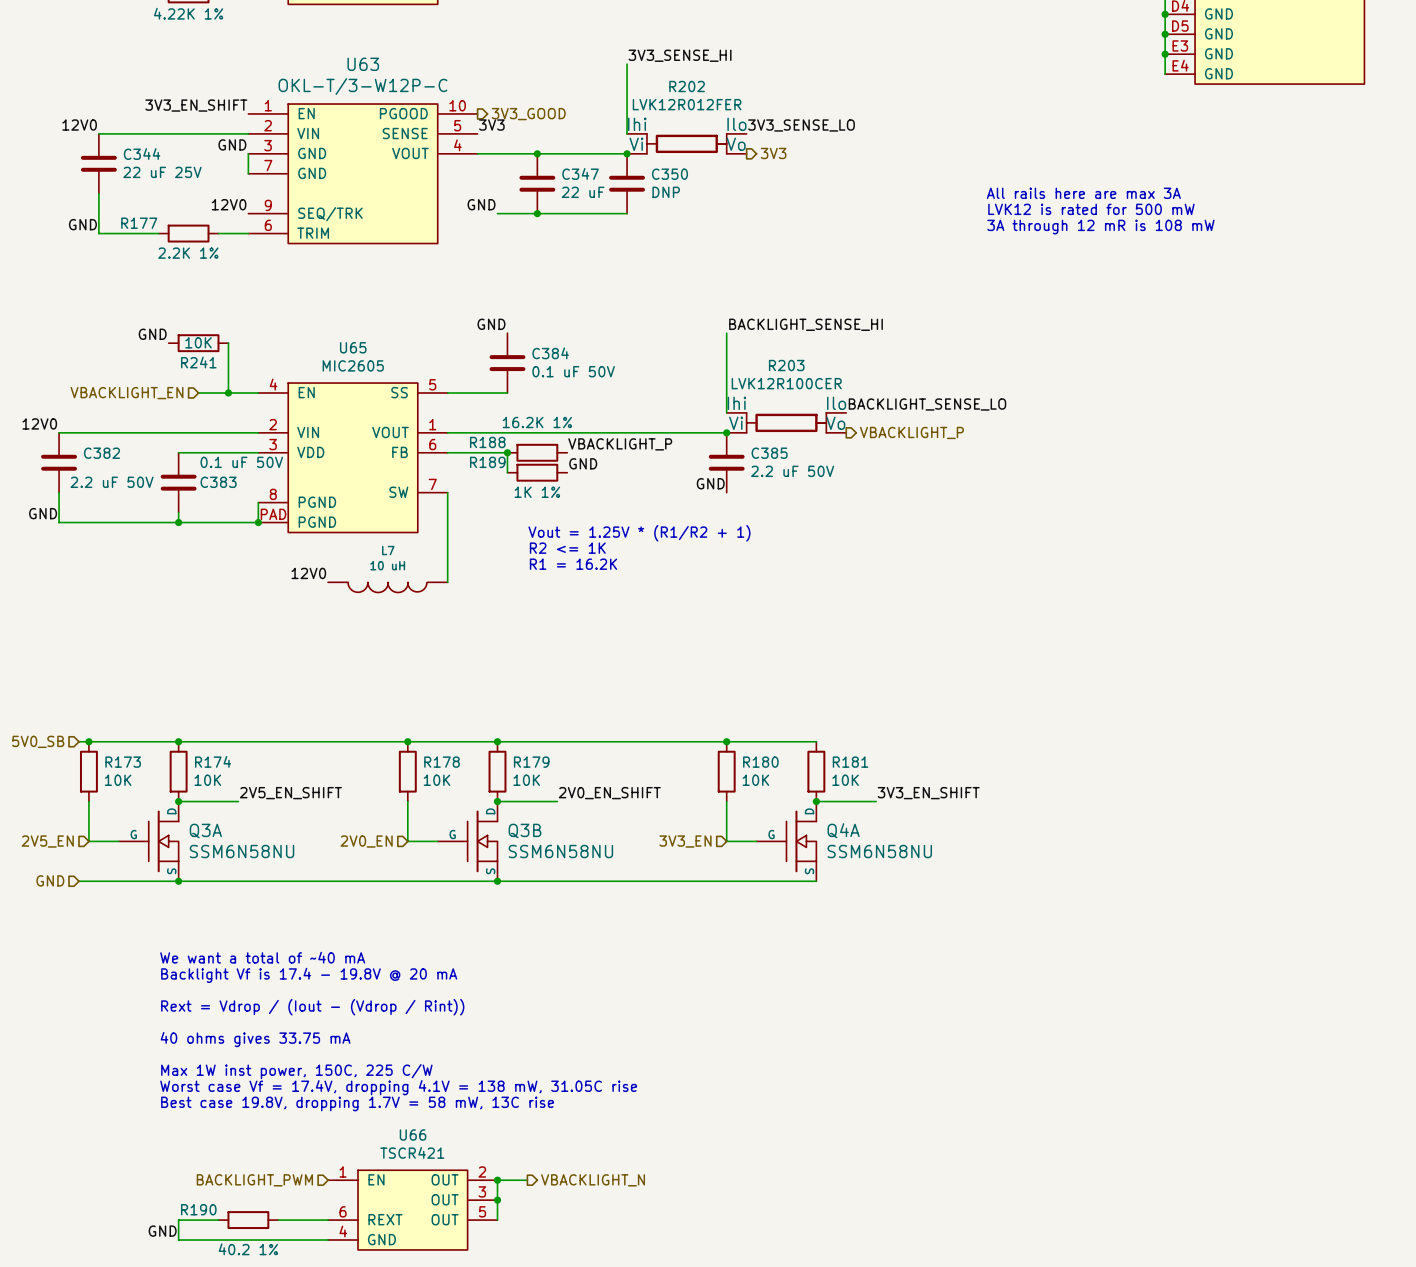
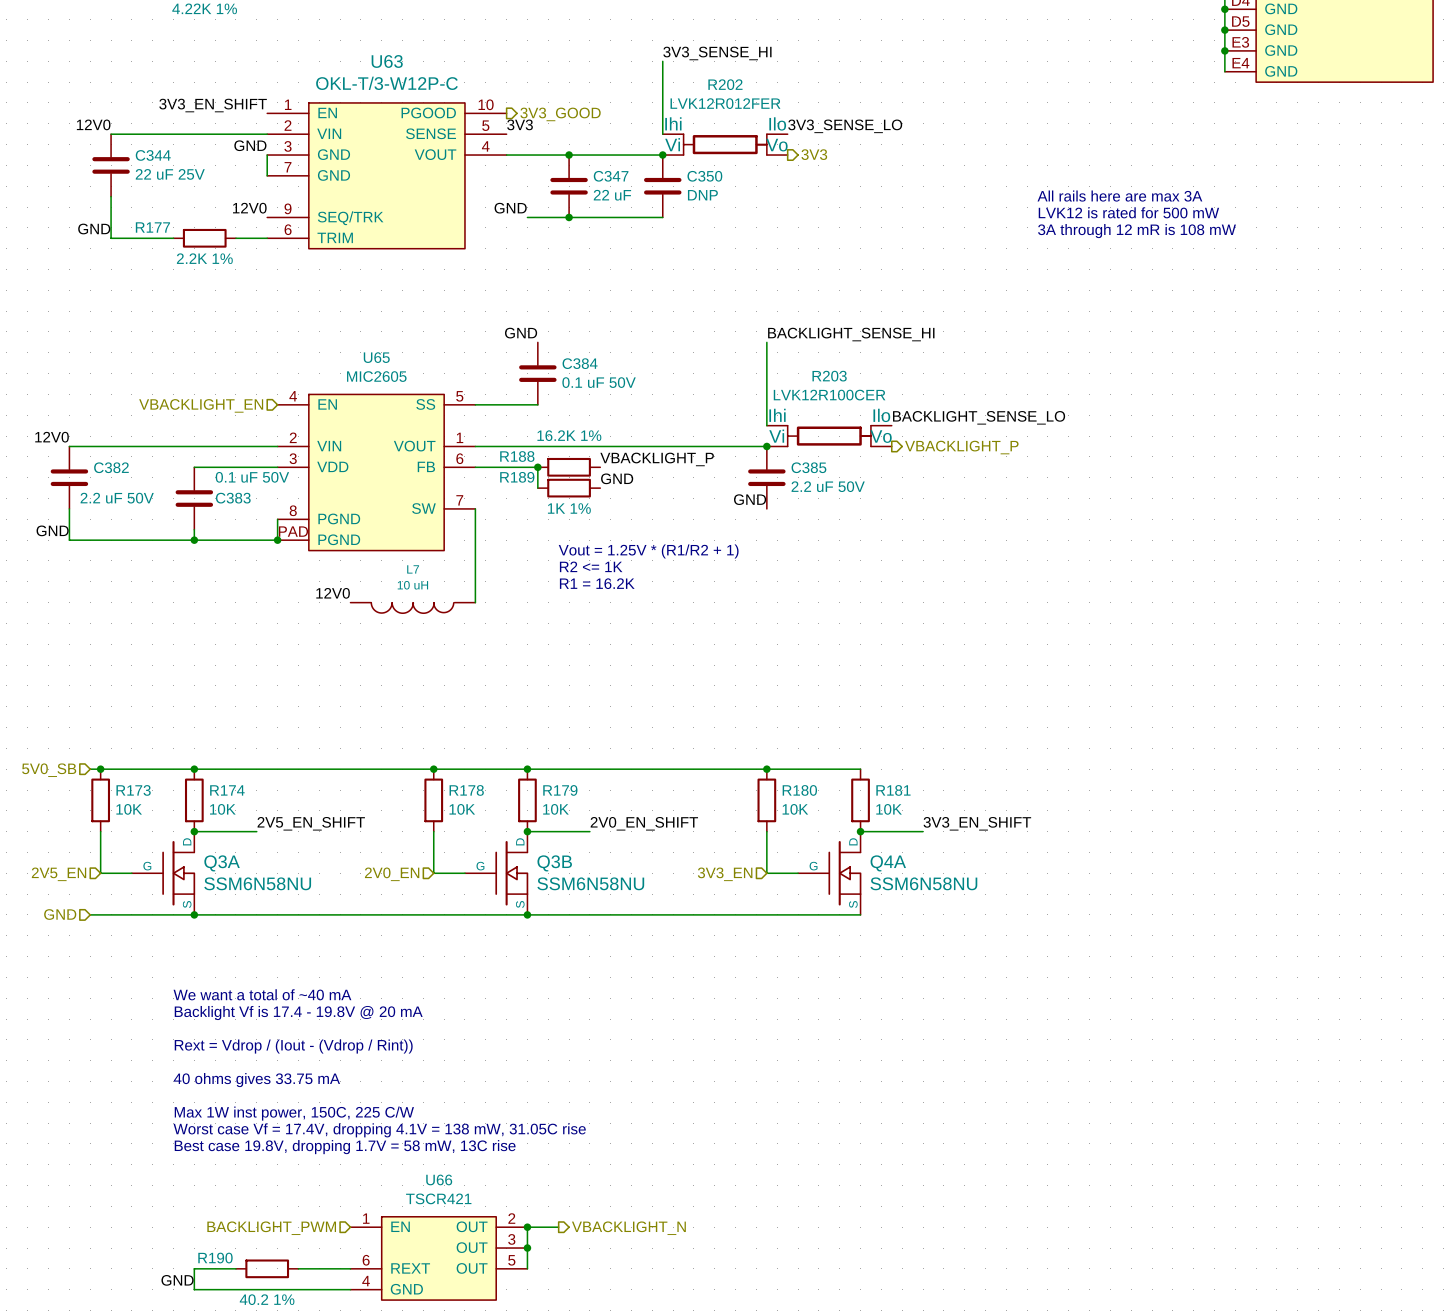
label: GND (152, 334) -> none
R241: 10K (198, 343) -> none
wire: (228, 343) (228, 392) -> none
wire: (198, 392) (258, 392) -> none
junction: (228, 392) -> none
hierarchical label position: VBACKLIGHT_EN (126, 393) -> VBACKLIGHT_EN (201, 405)

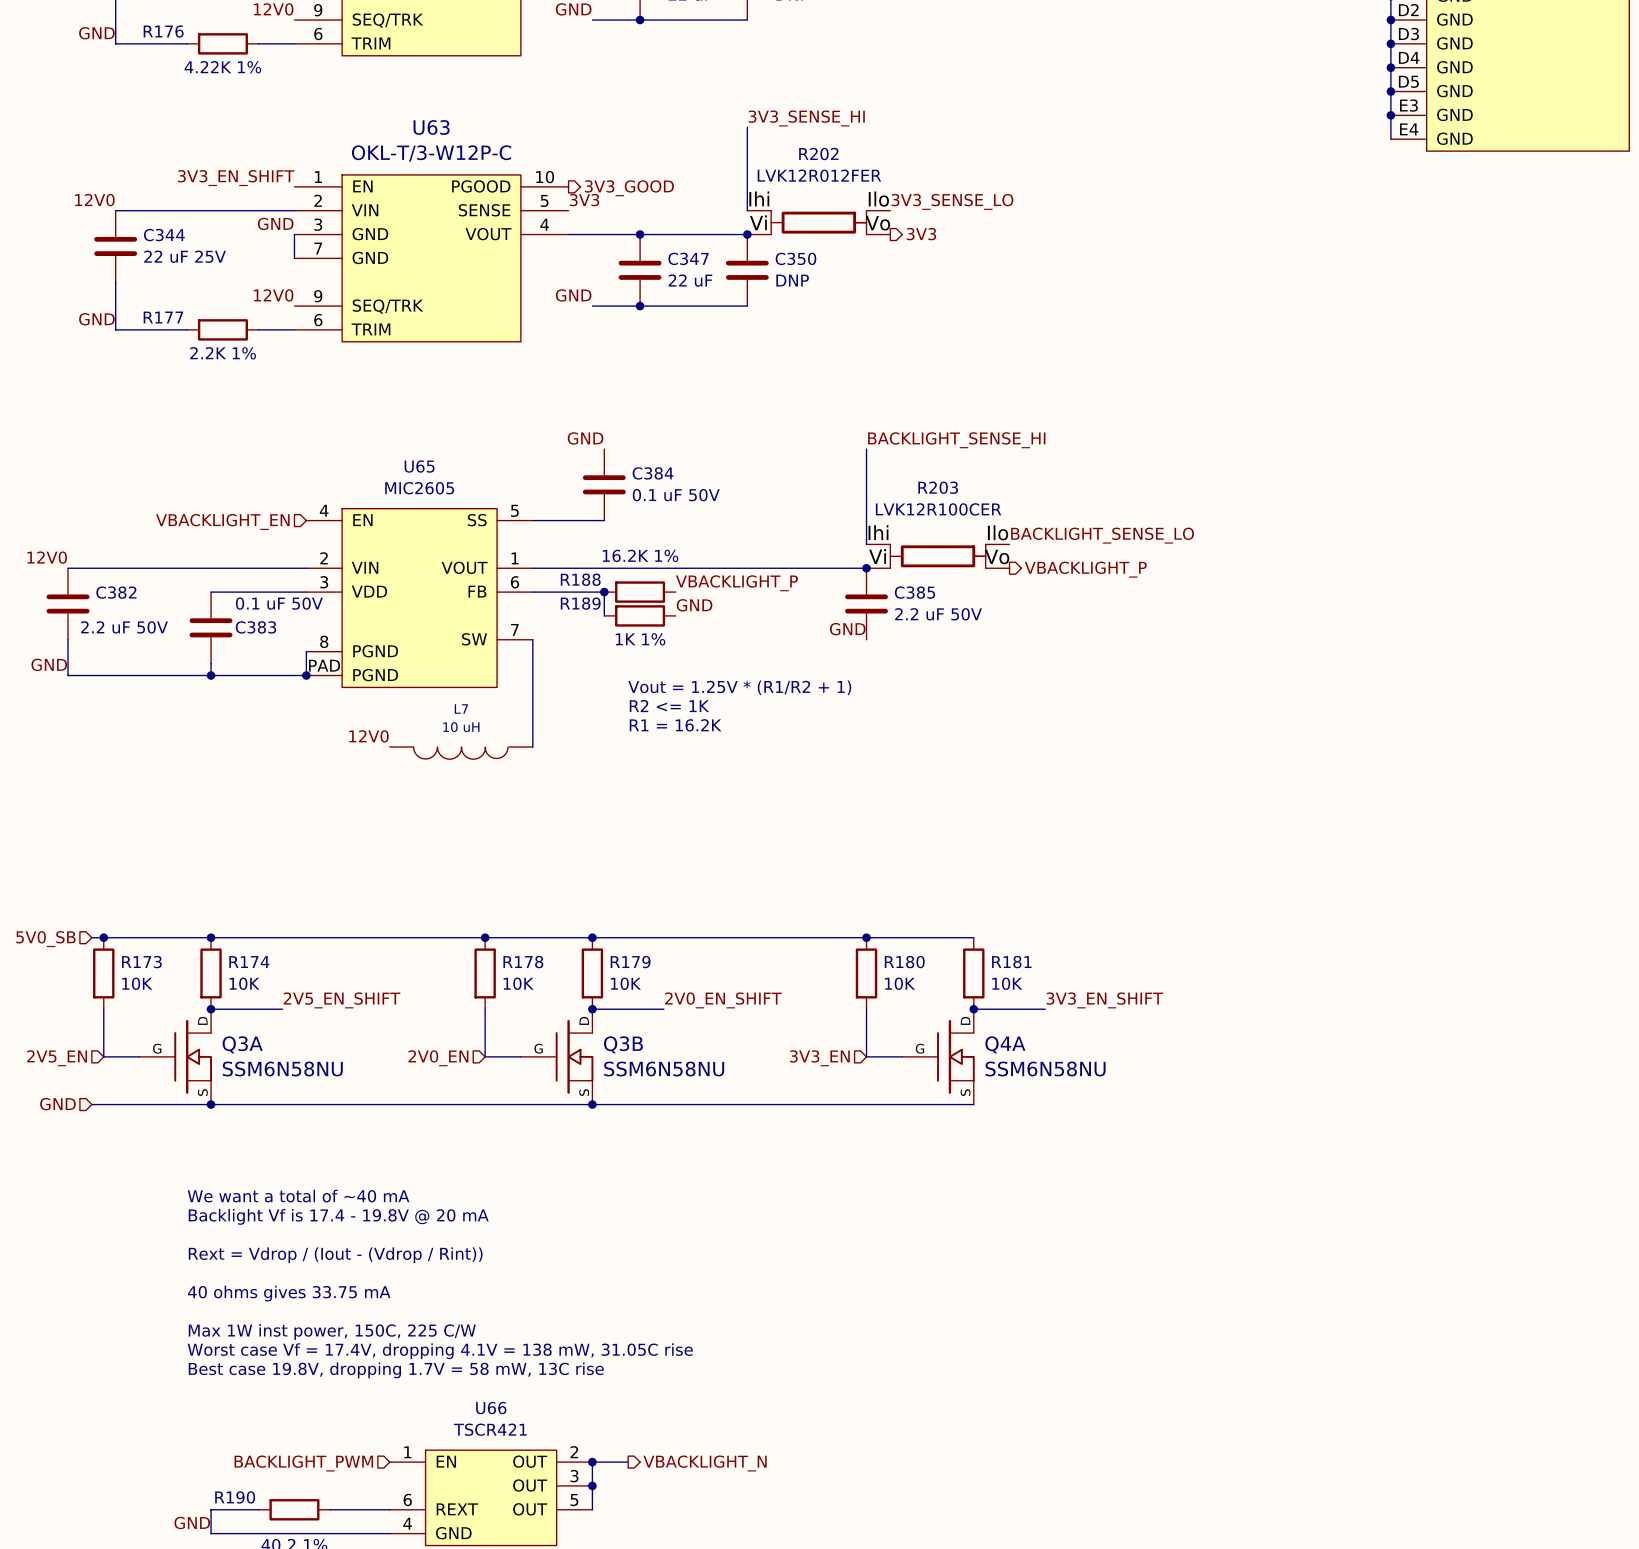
text: All rails here are max 3A (1119, 196) -> none
text: LVK12 is rated for 500 mW (1128, 212) -> none
text: 3A through 12 mR is 108 mW (1137, 231) -> none

